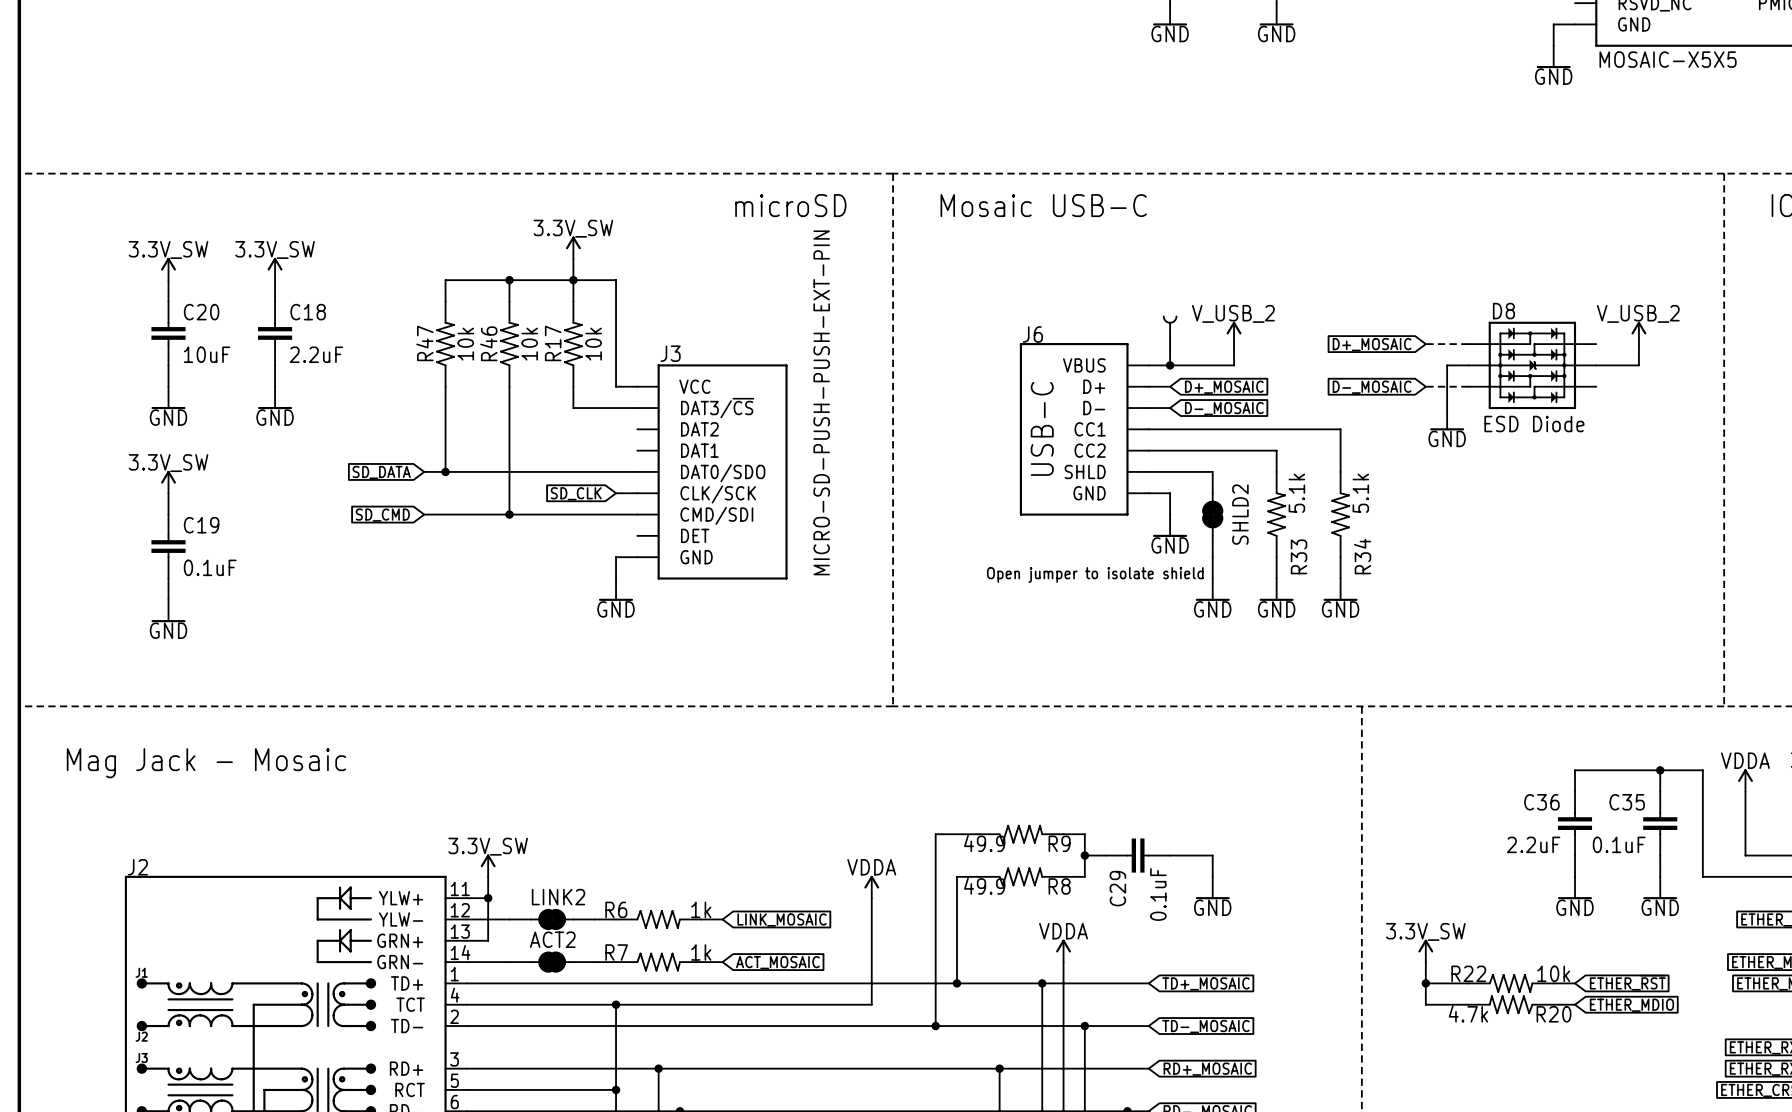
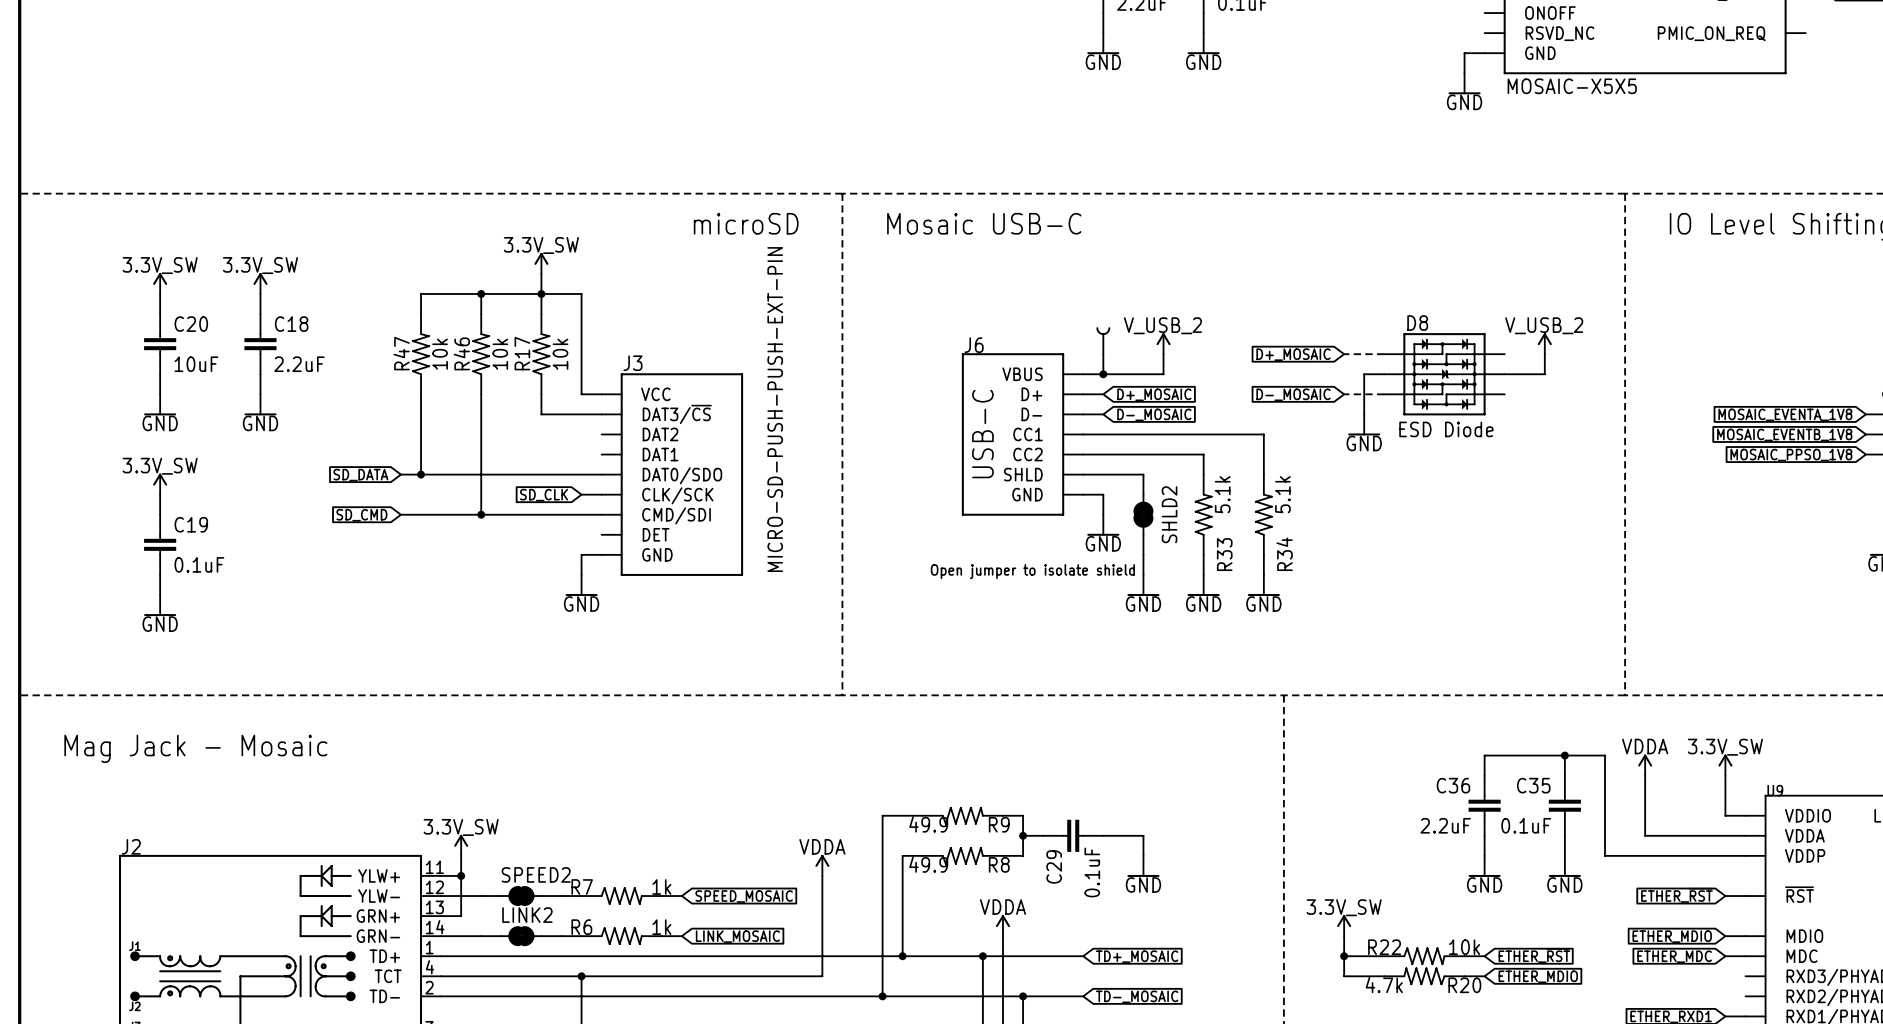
LINK2 name: LINK2 (558, 897) -> SPEED2 (536, 874)
R6 name: R6 (616, 909) -> R7 (582, 886)
global label: LINK_MOSAIC (782, 919) -> SPEED_MOSAIC (744, 896)
ACT2 name: ACT2 (552, 939) -> LINK2 (527, 915)
R7 name: R7 (616, 952) -> R6 (581, 927)
global label: ACT_MOSAIC (777, 962) -> LINK_MOSAIC (737, 936)

